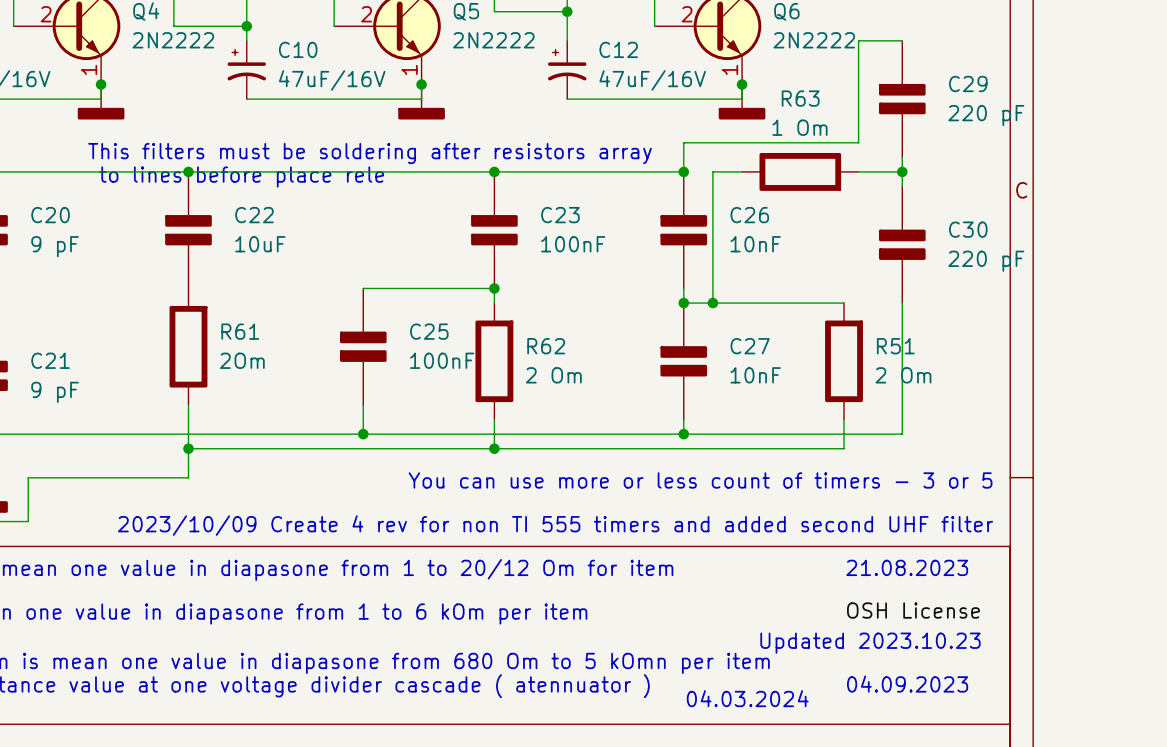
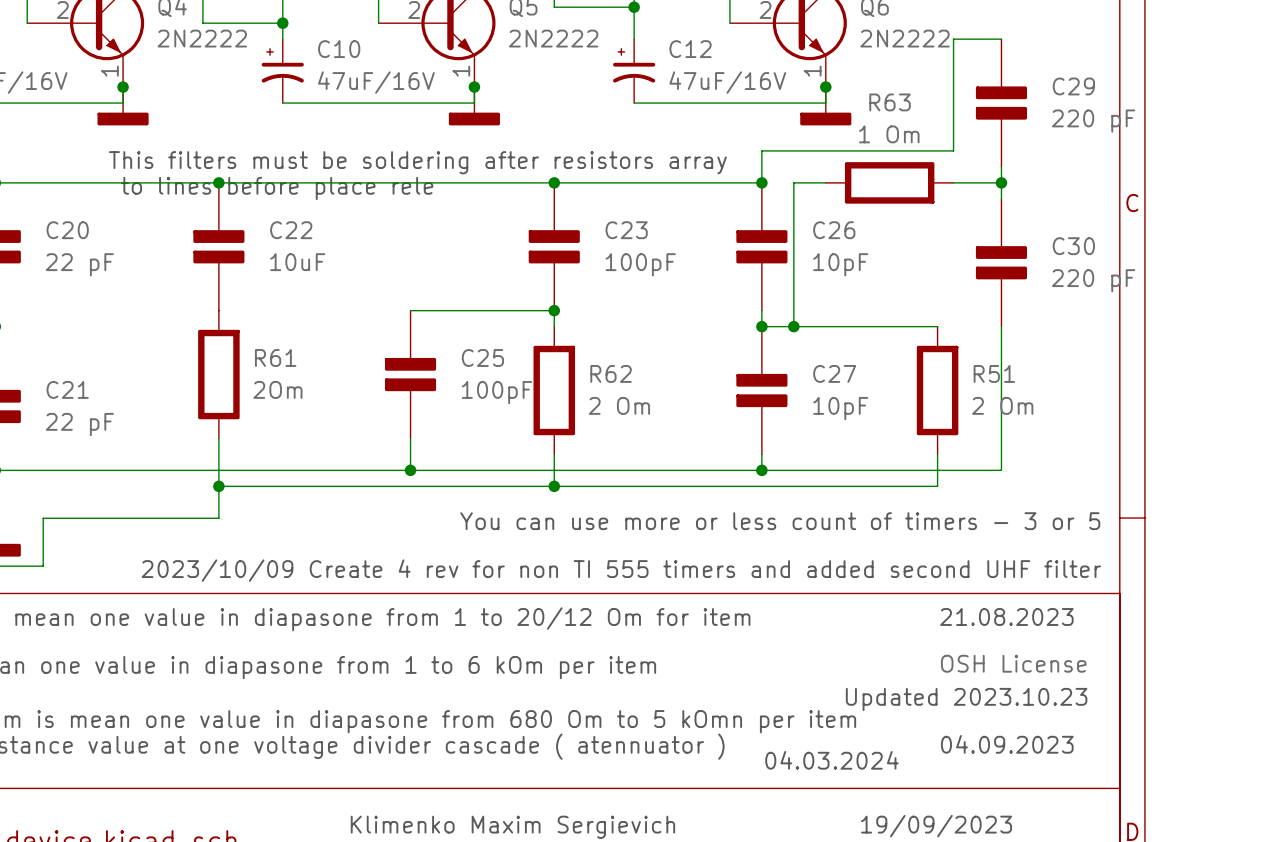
C23 value: 100nF (573, 244) -> 100pF (640, 264)
C26 value: 10nF (755, 244) -> 10pF (840, 264)
C20 value: 9 pF (55, 246) -> 22 pF (79, 264)
C25 value: 100nF (442, 360) -> 100pF (496, 392)
C27 value: 10nF (755, 375) -> 10pF (840, 408)
C21 value: 9 pF (55, 392) -> 22 pF (79, 424)

